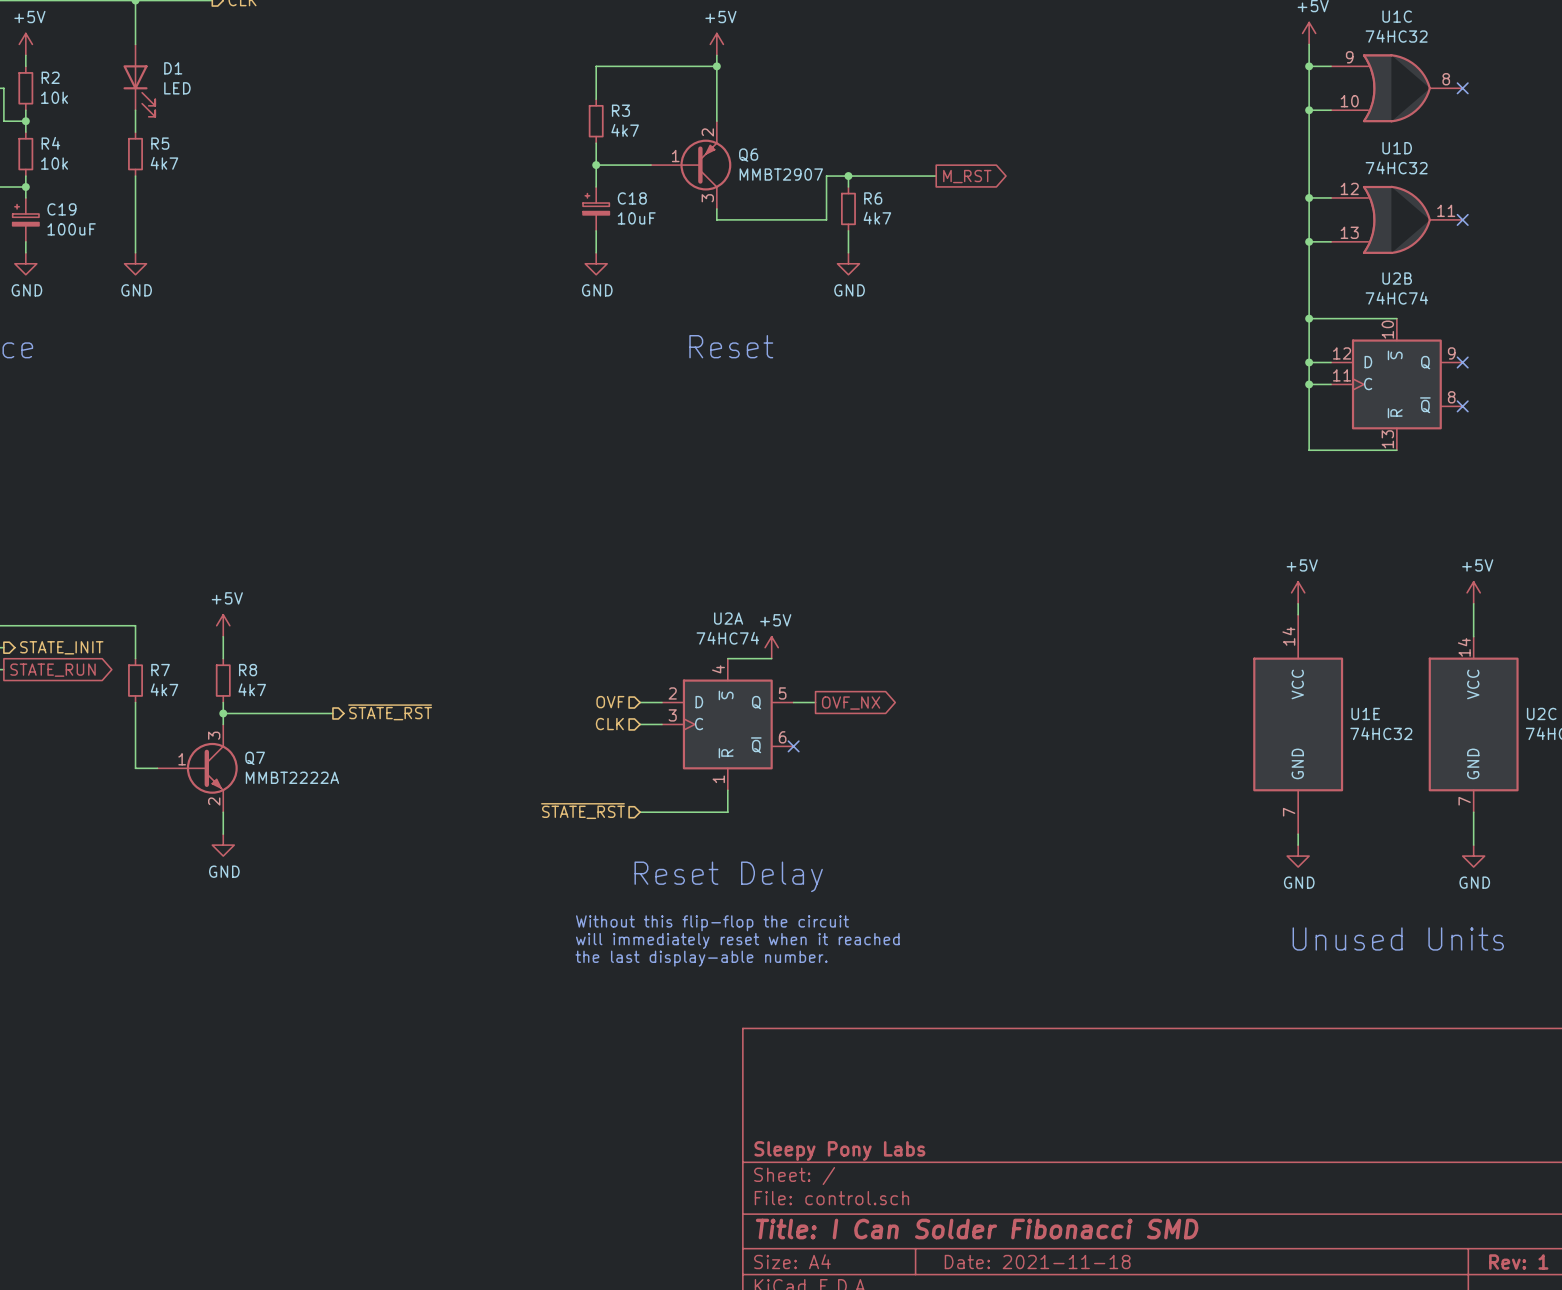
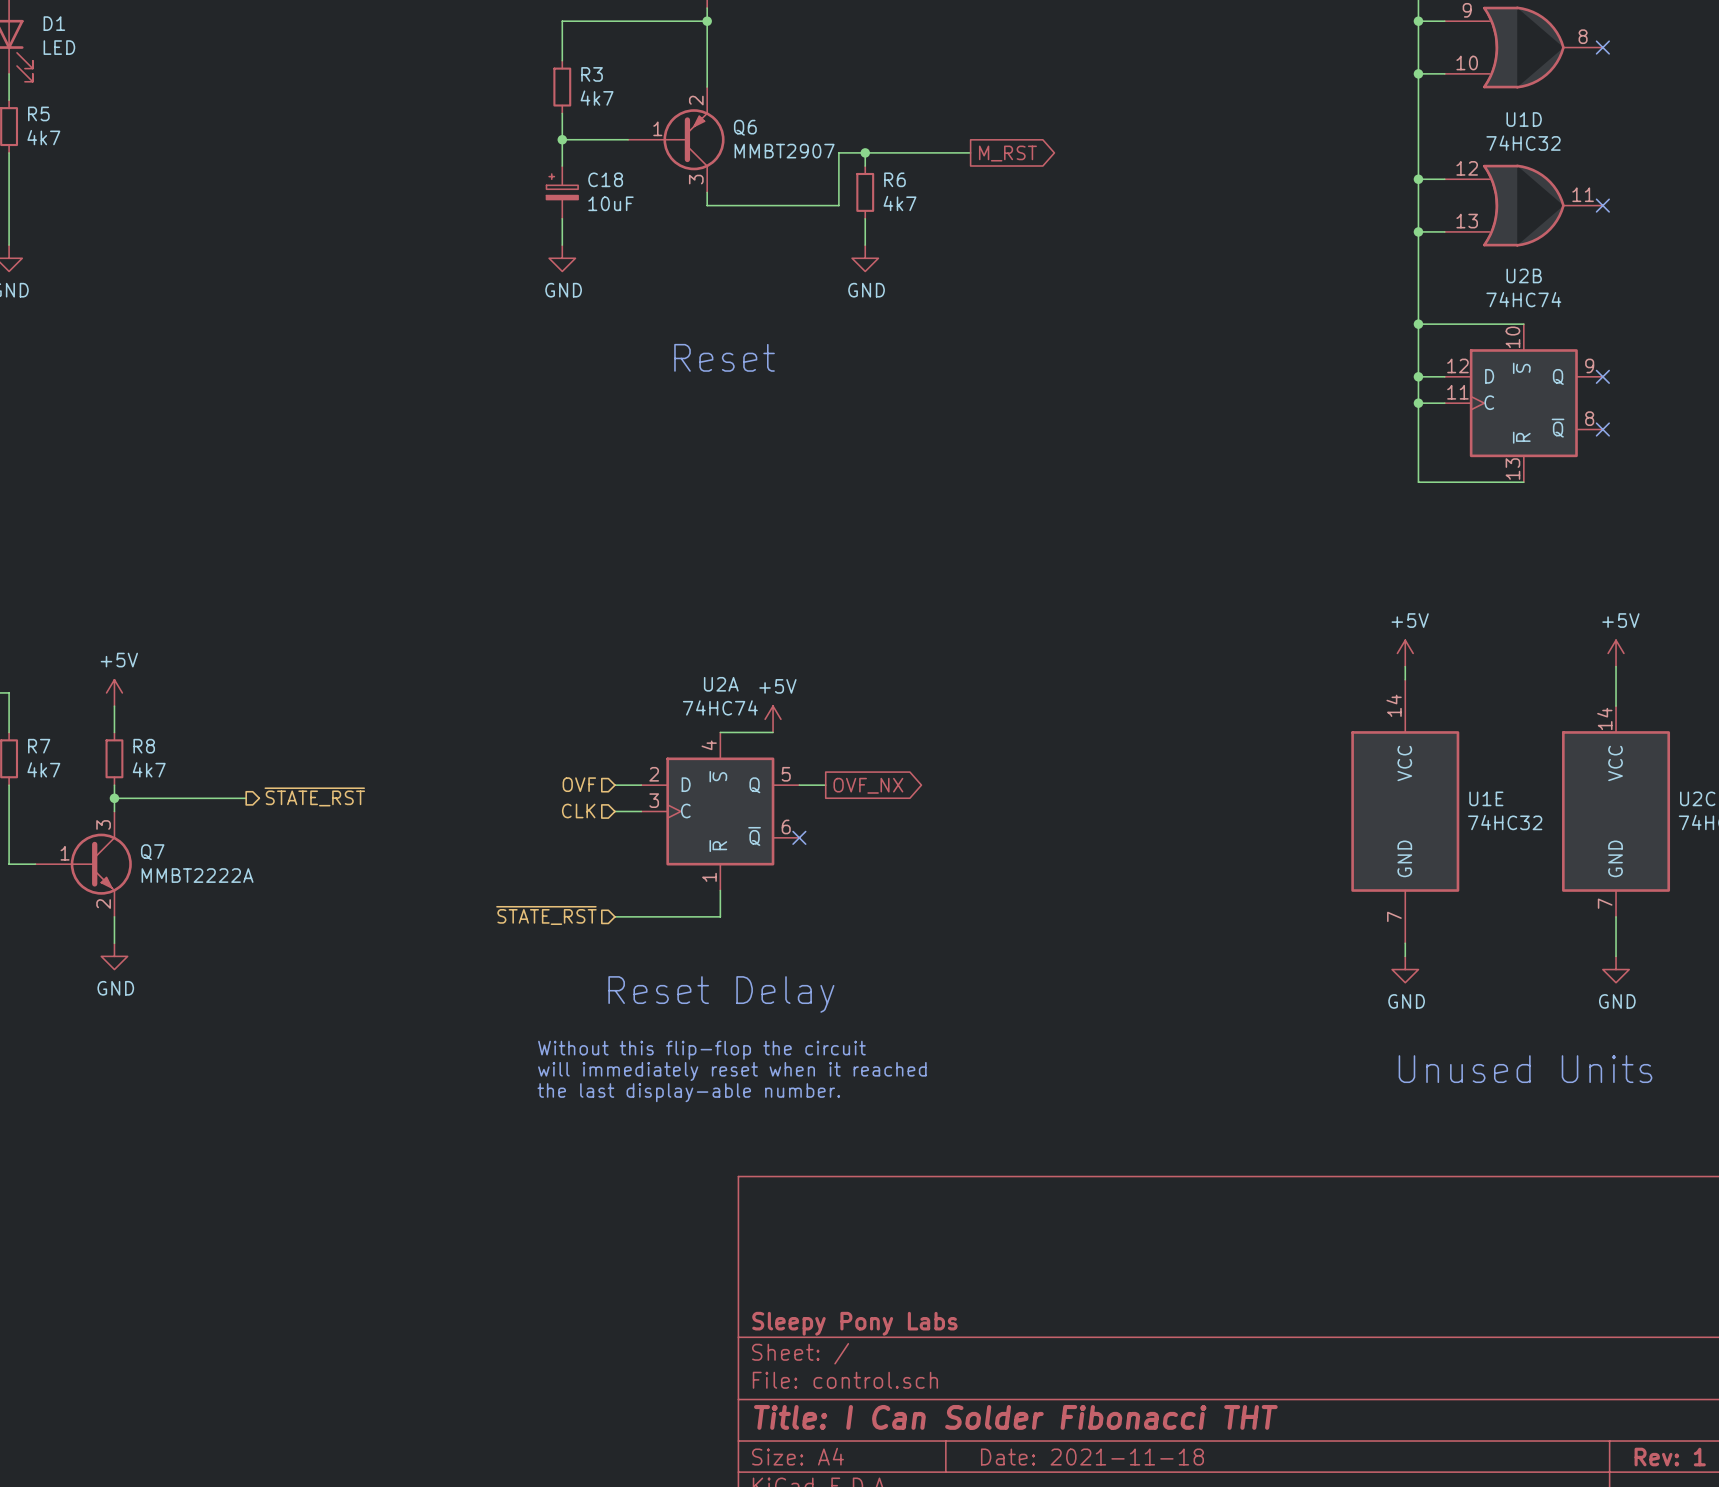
title block: Title: I Can Solder Fibonacci SMD (977, 1229) -> Title: I Can Solder Fibonacci THT (1015, 1417)

